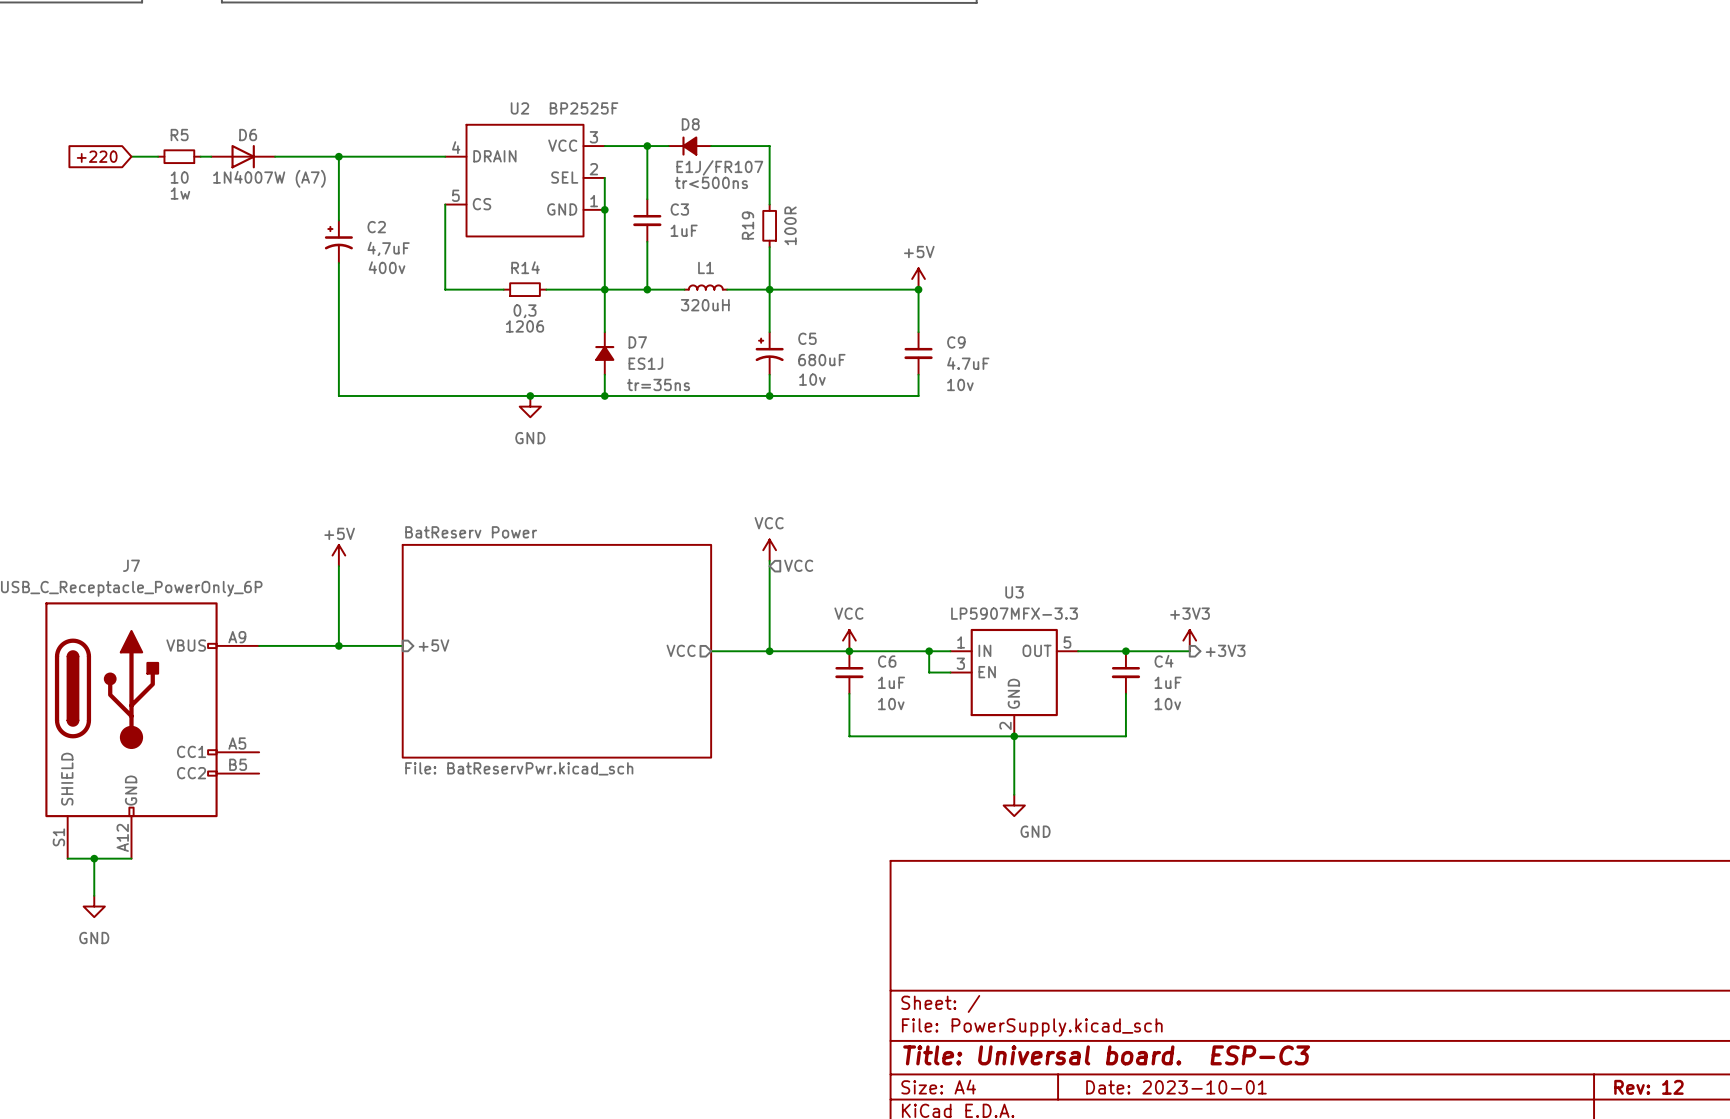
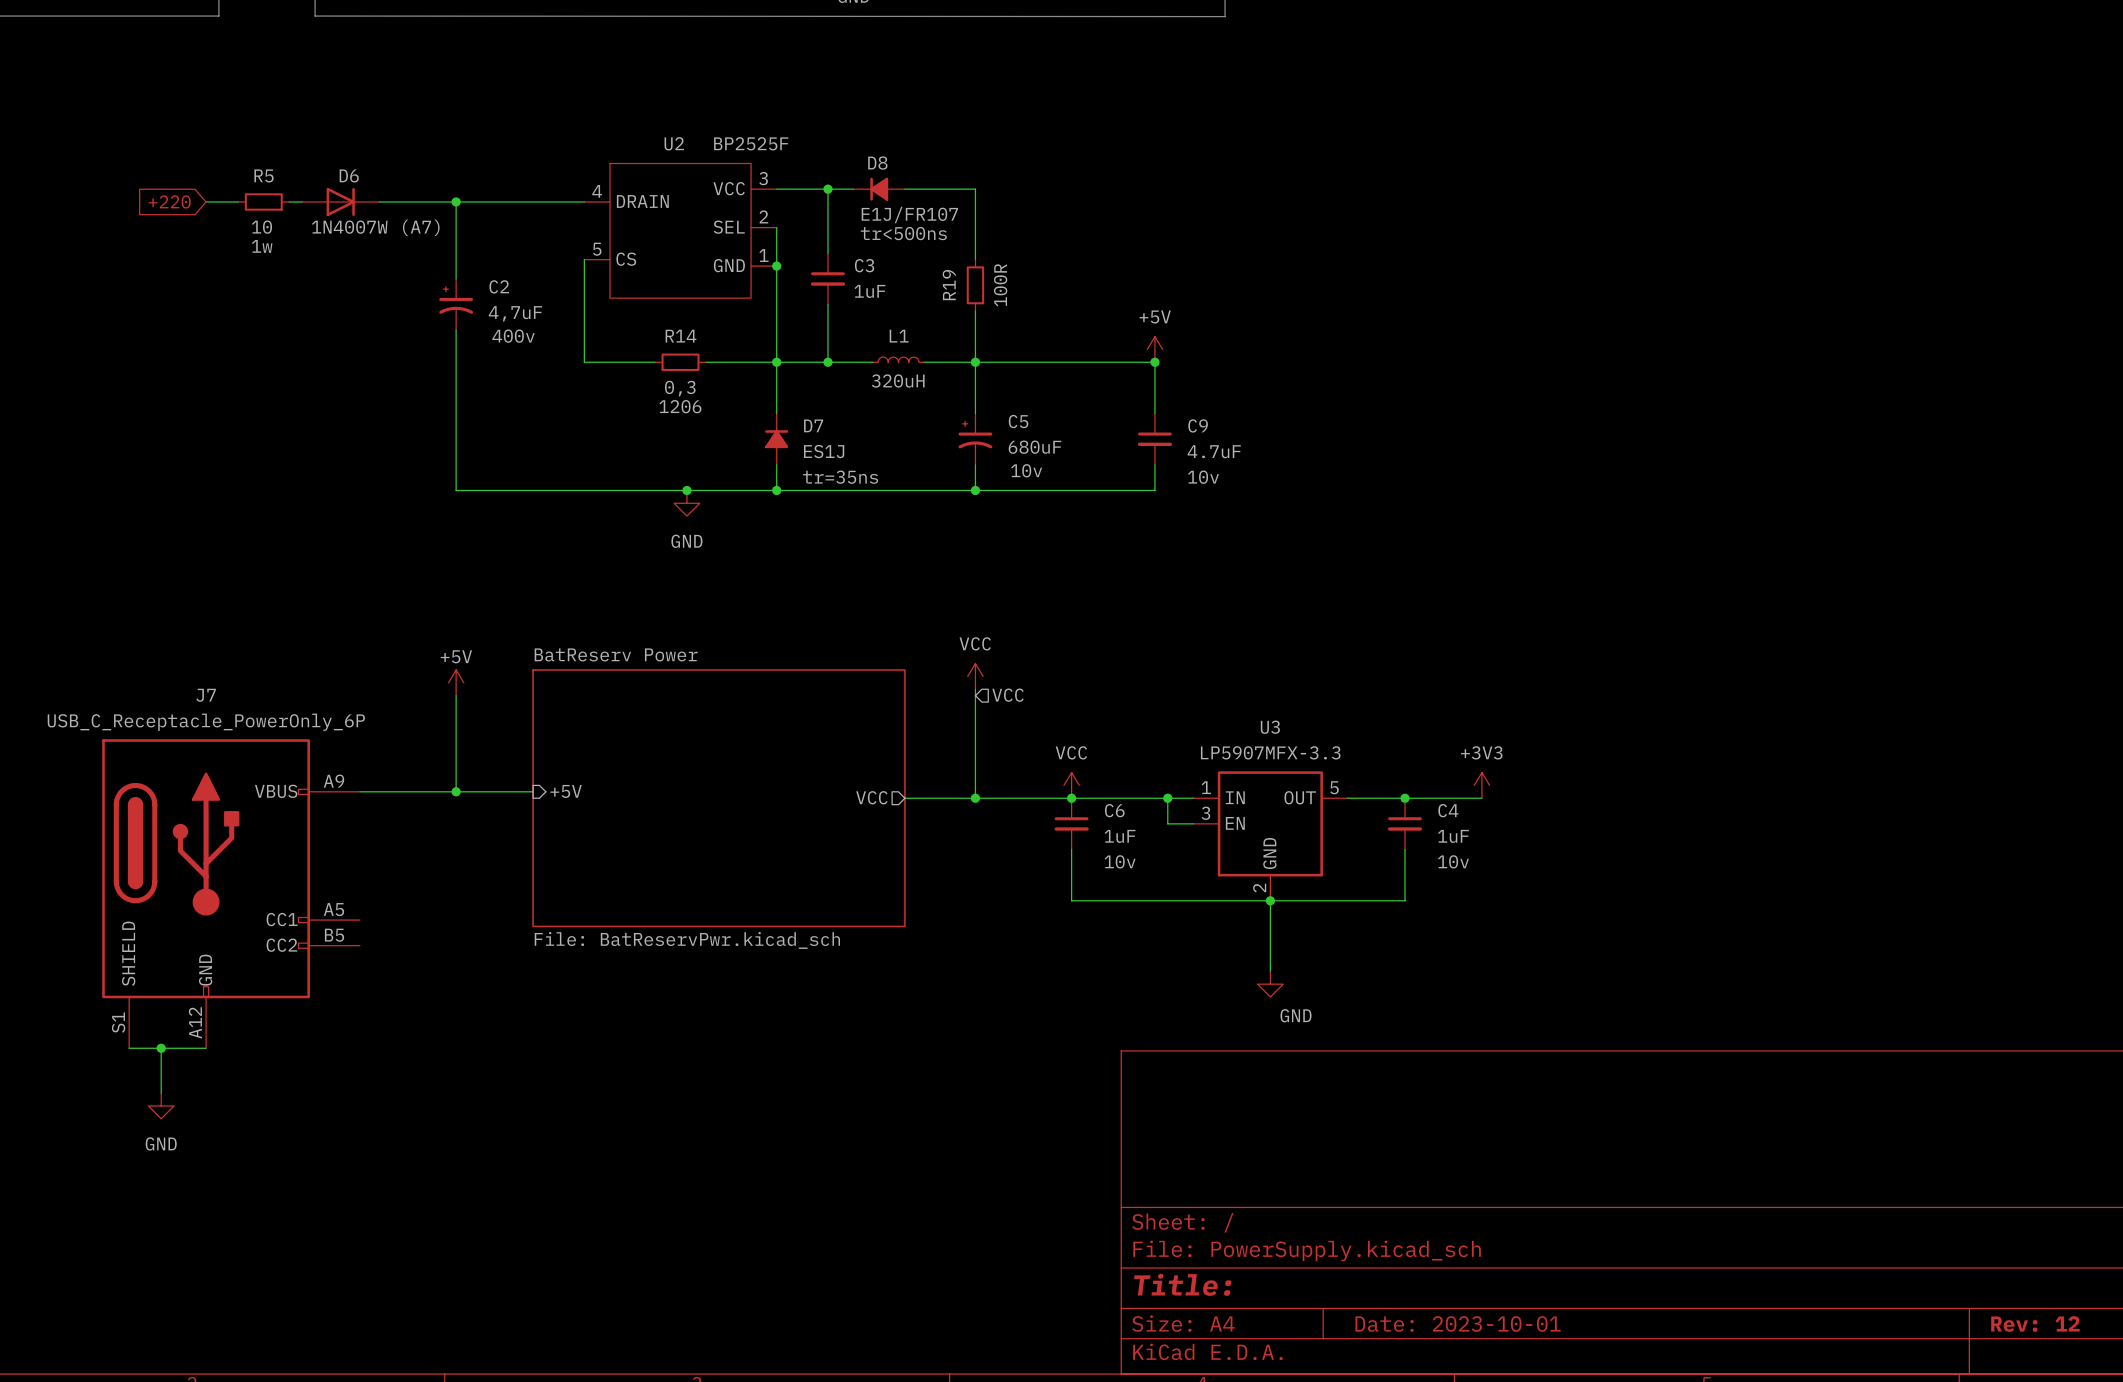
hierarchical label: +3V3 (1225, 650) -> none
title block: Title: Universal board. ESP-C3 (1106, 1055) -> Title: (1182, 1284)

